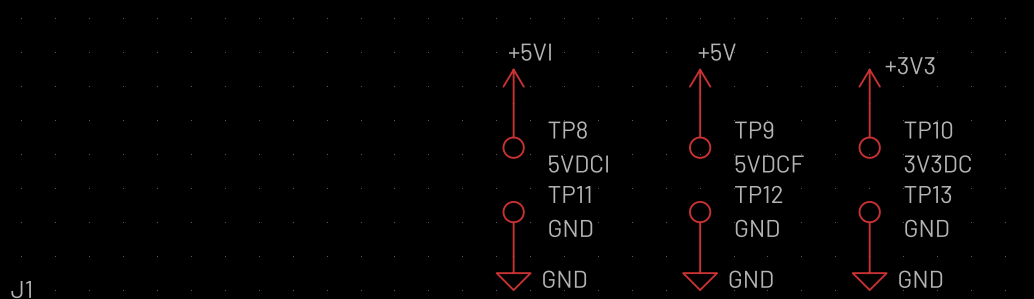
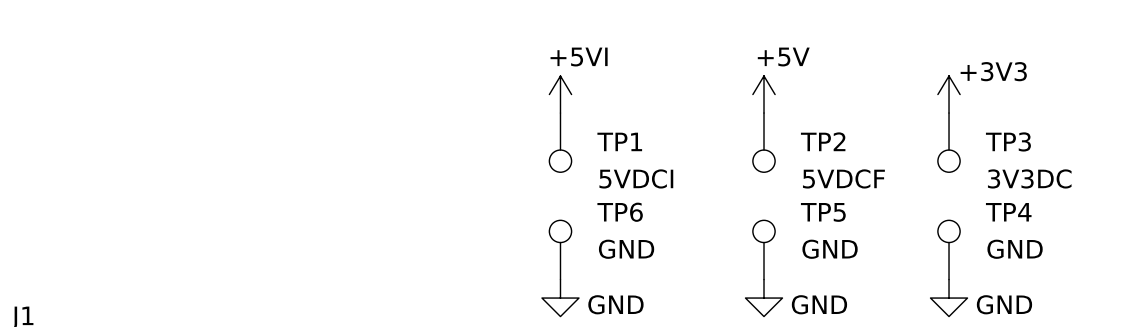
TP8 name: TP8 (567, 130) -> TP1 (619, 141)
TP9 name: TP9 (754, 130) -> TP2 (823, 141)
TP10 name: TP10 (928, 130) -> TP3 (1008, 141)
TP11 name: TP11 (569, 194) -> TP6 (620, 212)
TP12 name: TP12 (758, 194) -> TP5 (823, 212)
TP13 name: TP13 (927, 194) -> TP4 (1008, 212)

